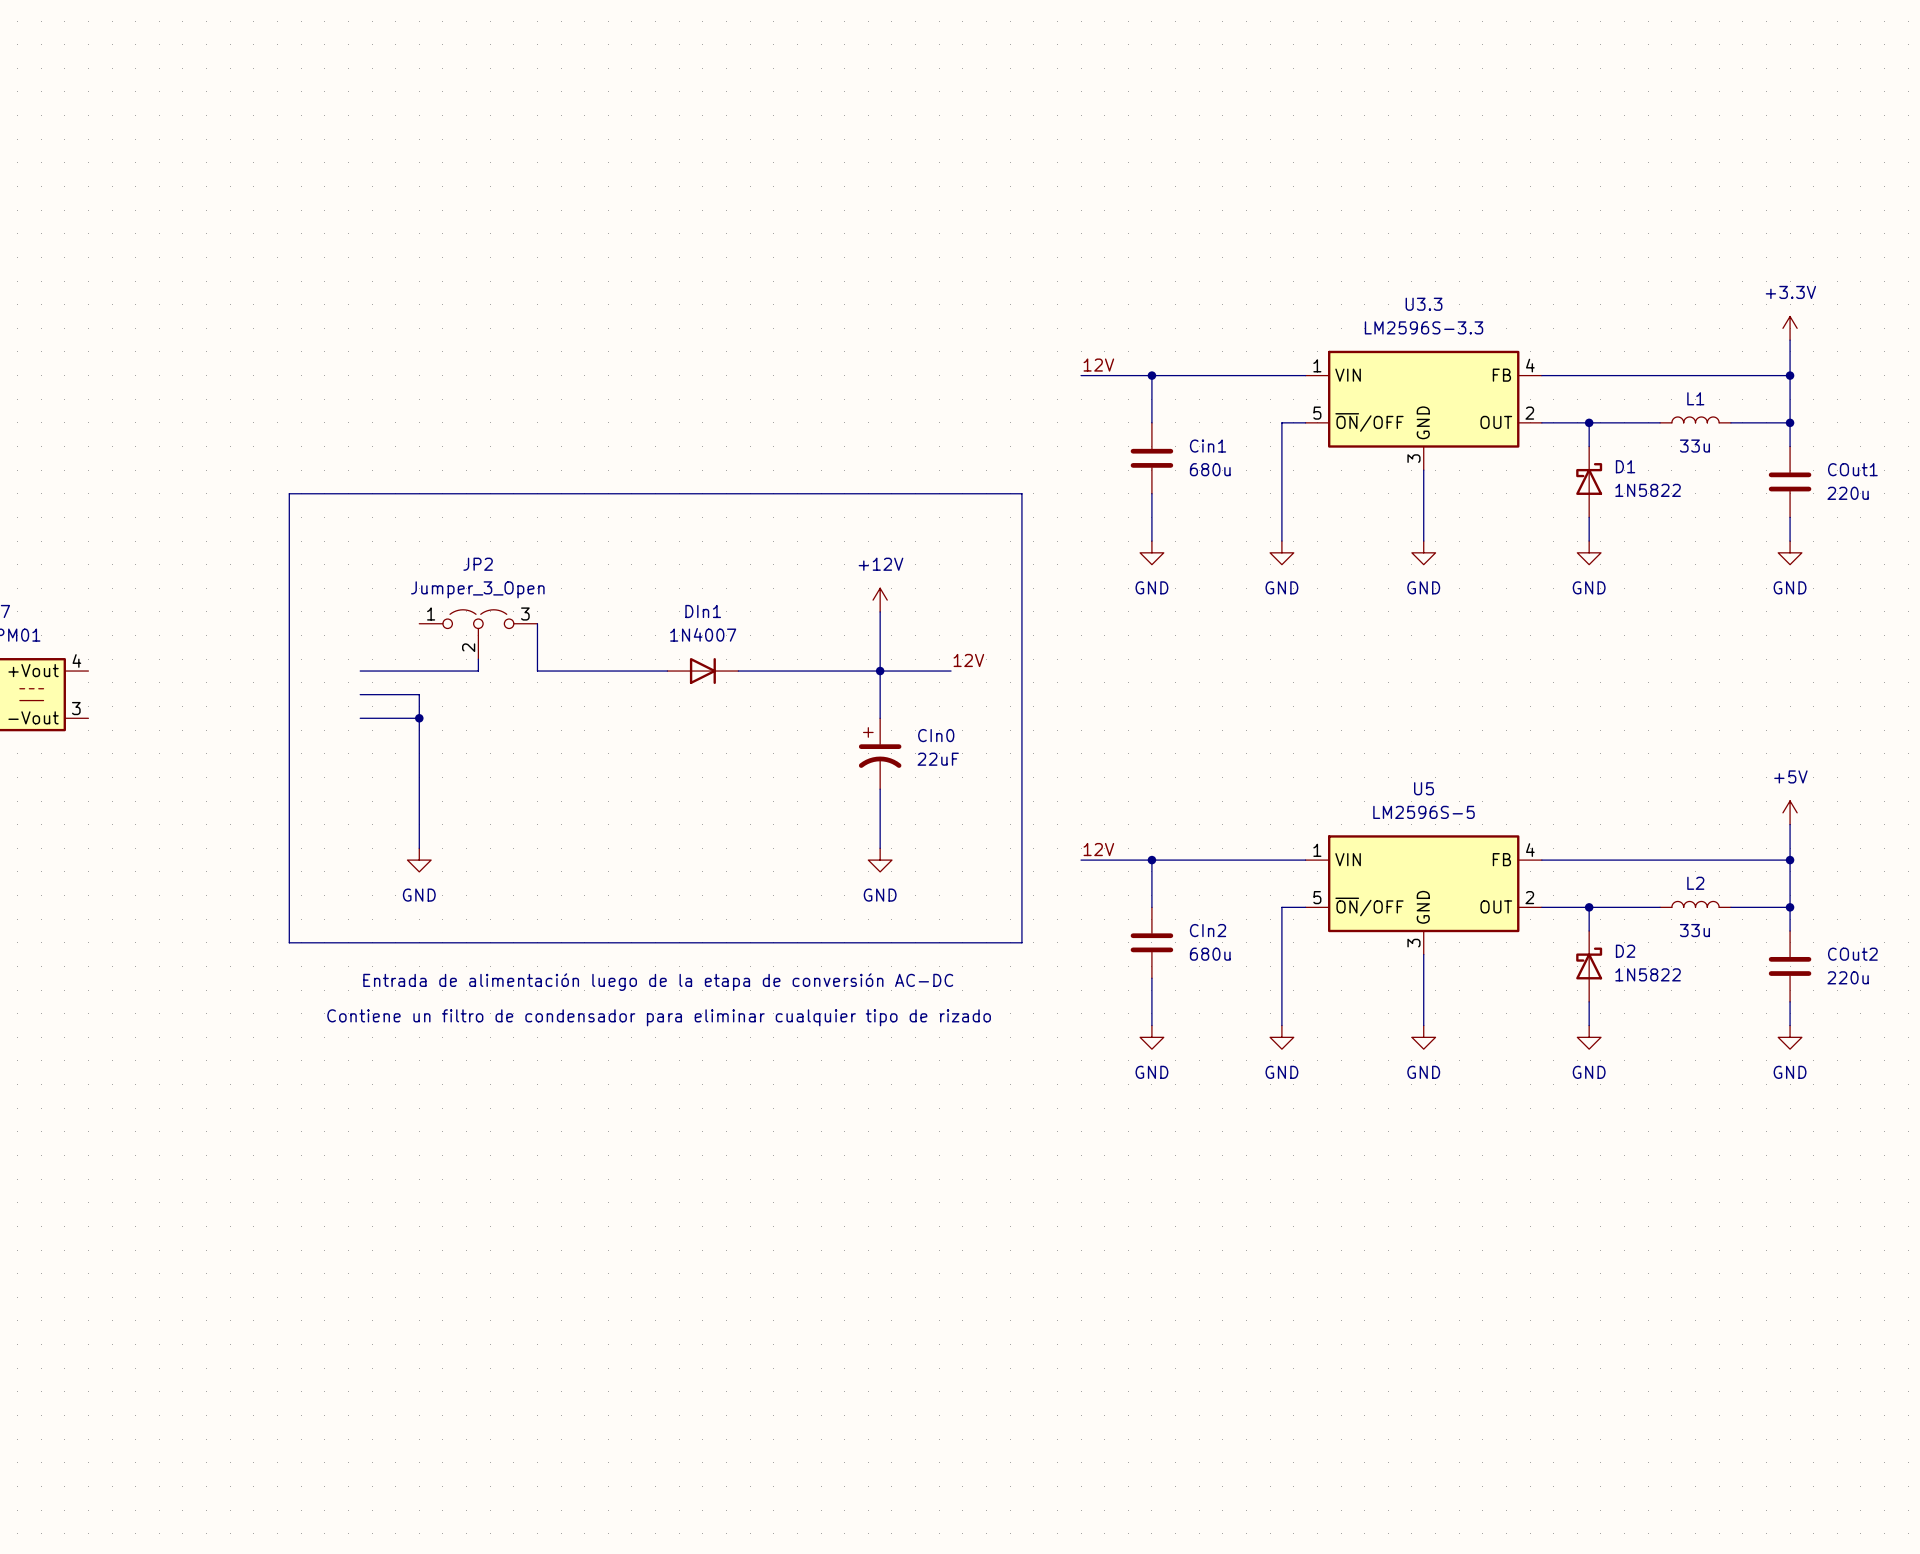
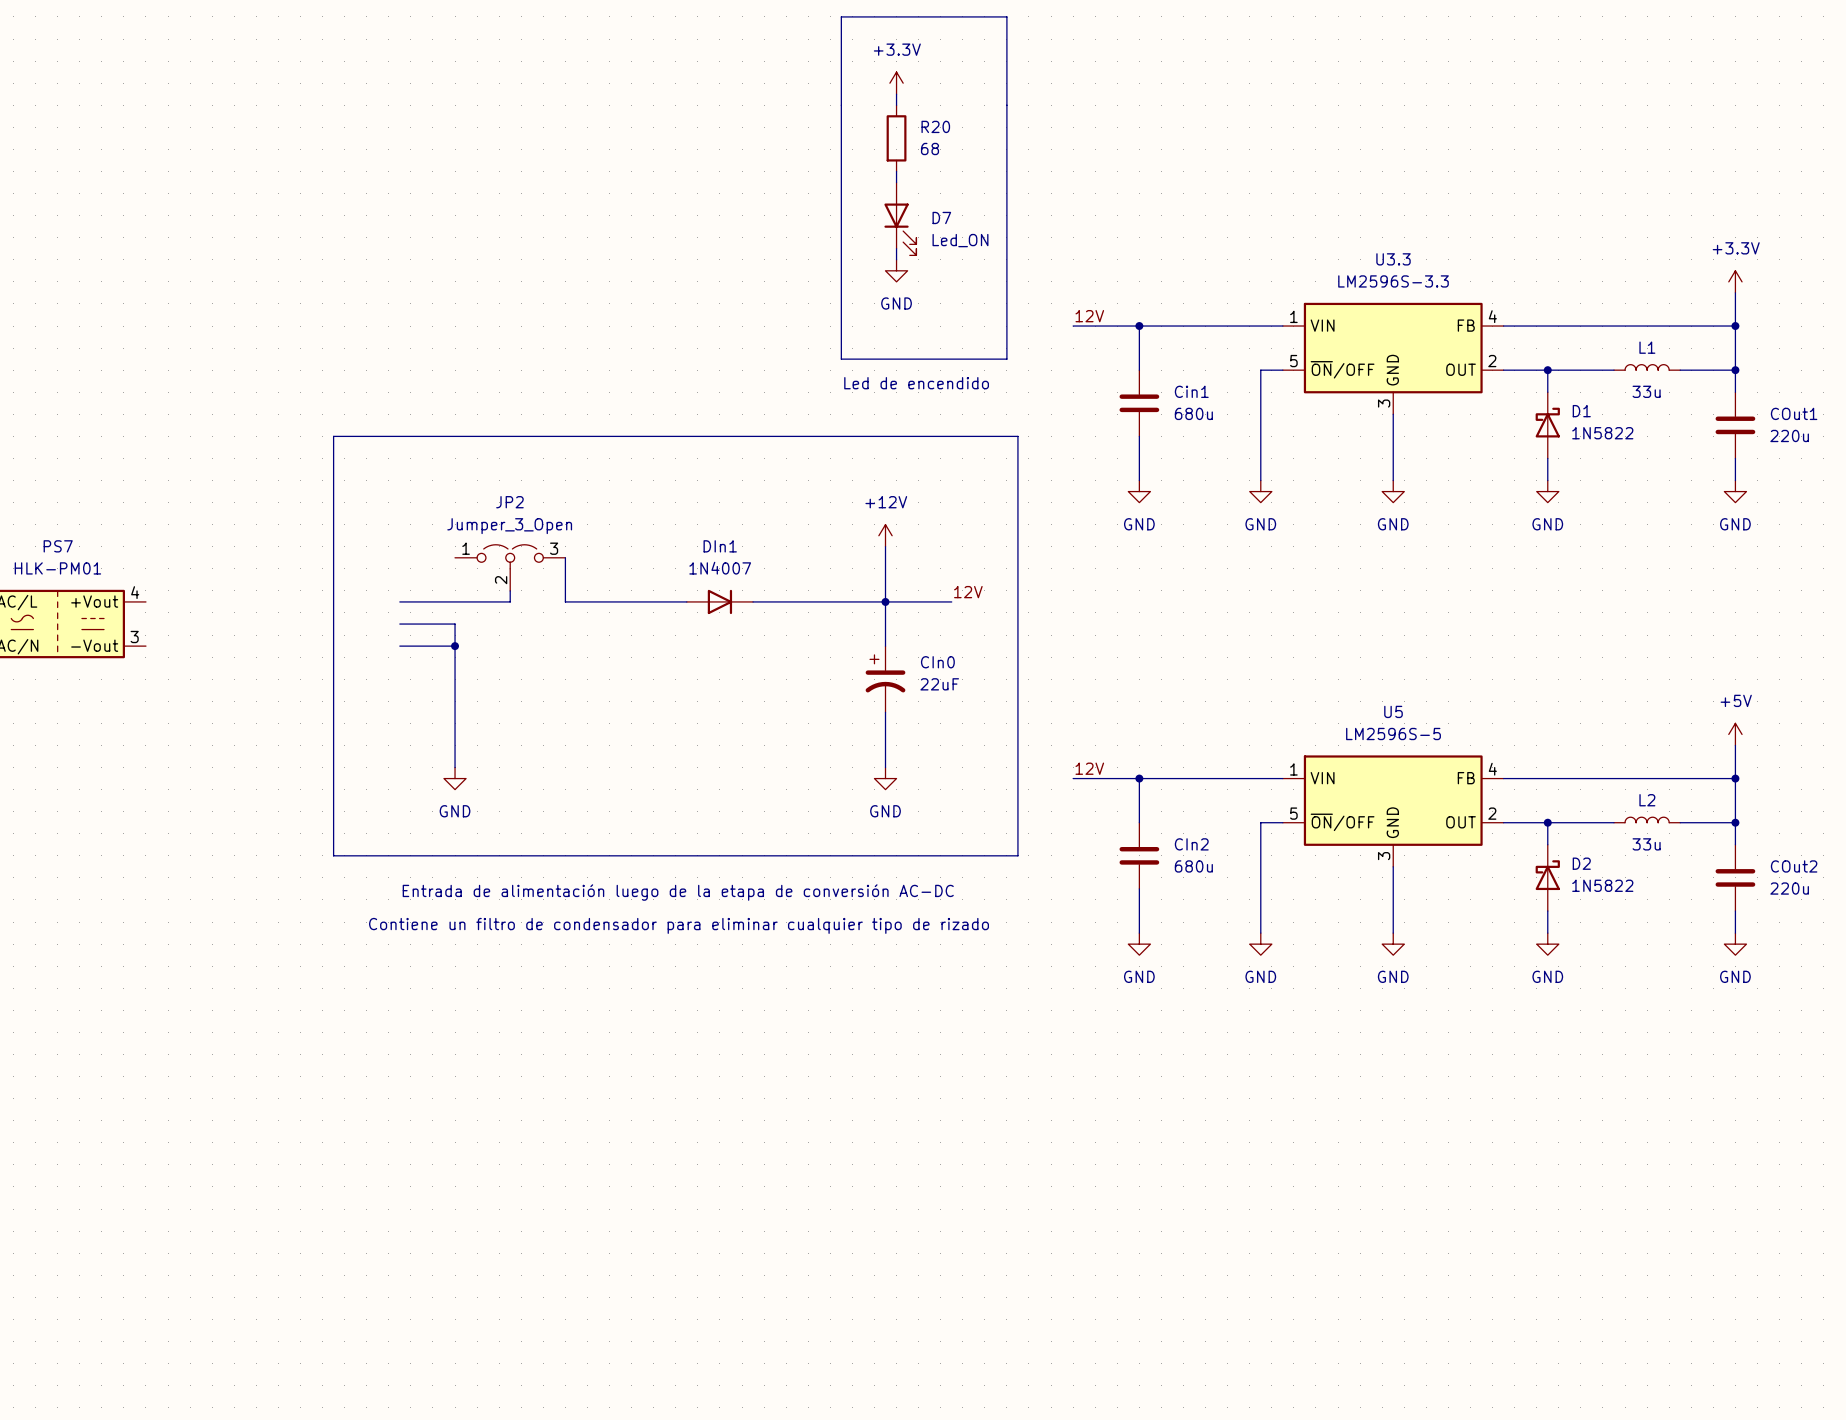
line: none -> (841, 16) (841, 359) (1006, 359) (1006, 16) (841, 16)
power symbol: none -> +3.3V (896, 83)
wire: none -> (896, 94) (896, 105)
R20: none -> 68 (896, 138)
wire: none -> (896, 171) (896, 182)
D7: none -> Led_ON (900, 218)
wire: none -> (896, 248) (896, 259)
power symbol: none -> GND (896, 270)
text: none -> Led de encendido (916, 383)

